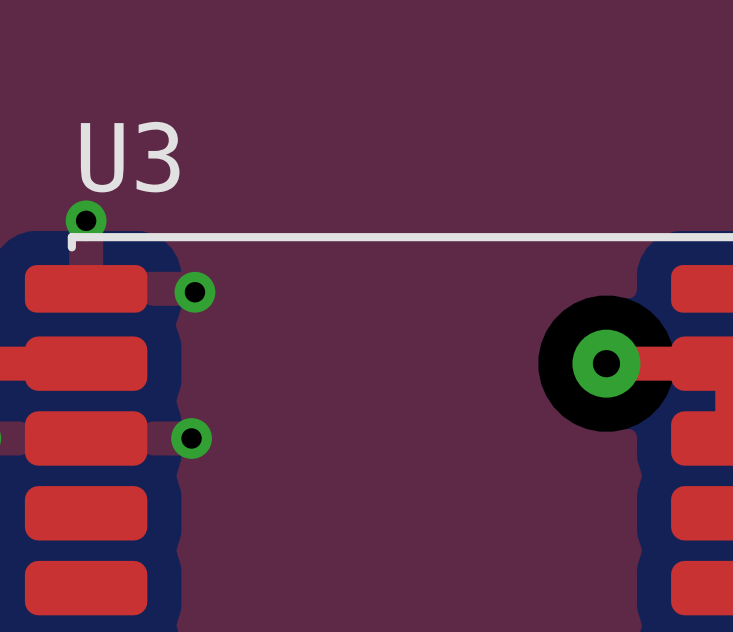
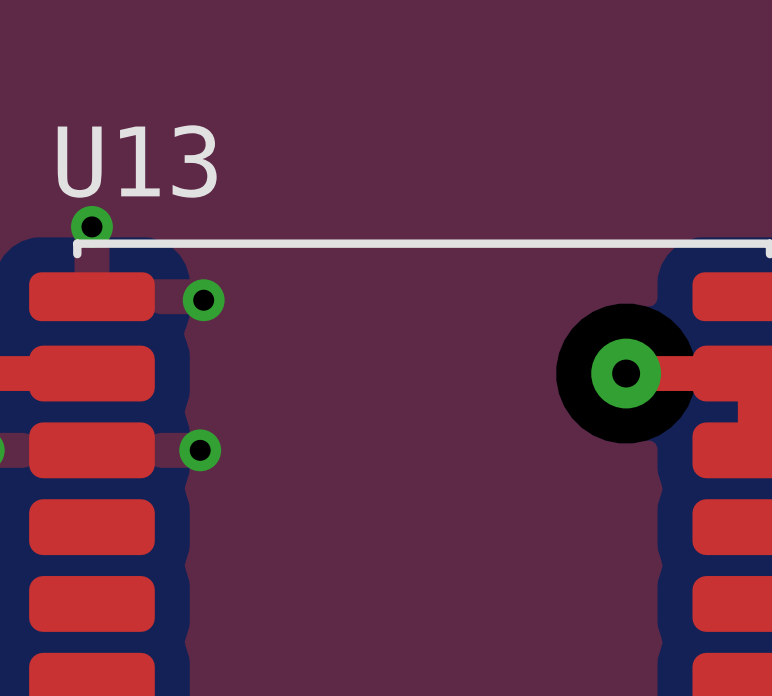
U3 name: U3 (130, 157) -> U13 (137, 161)

